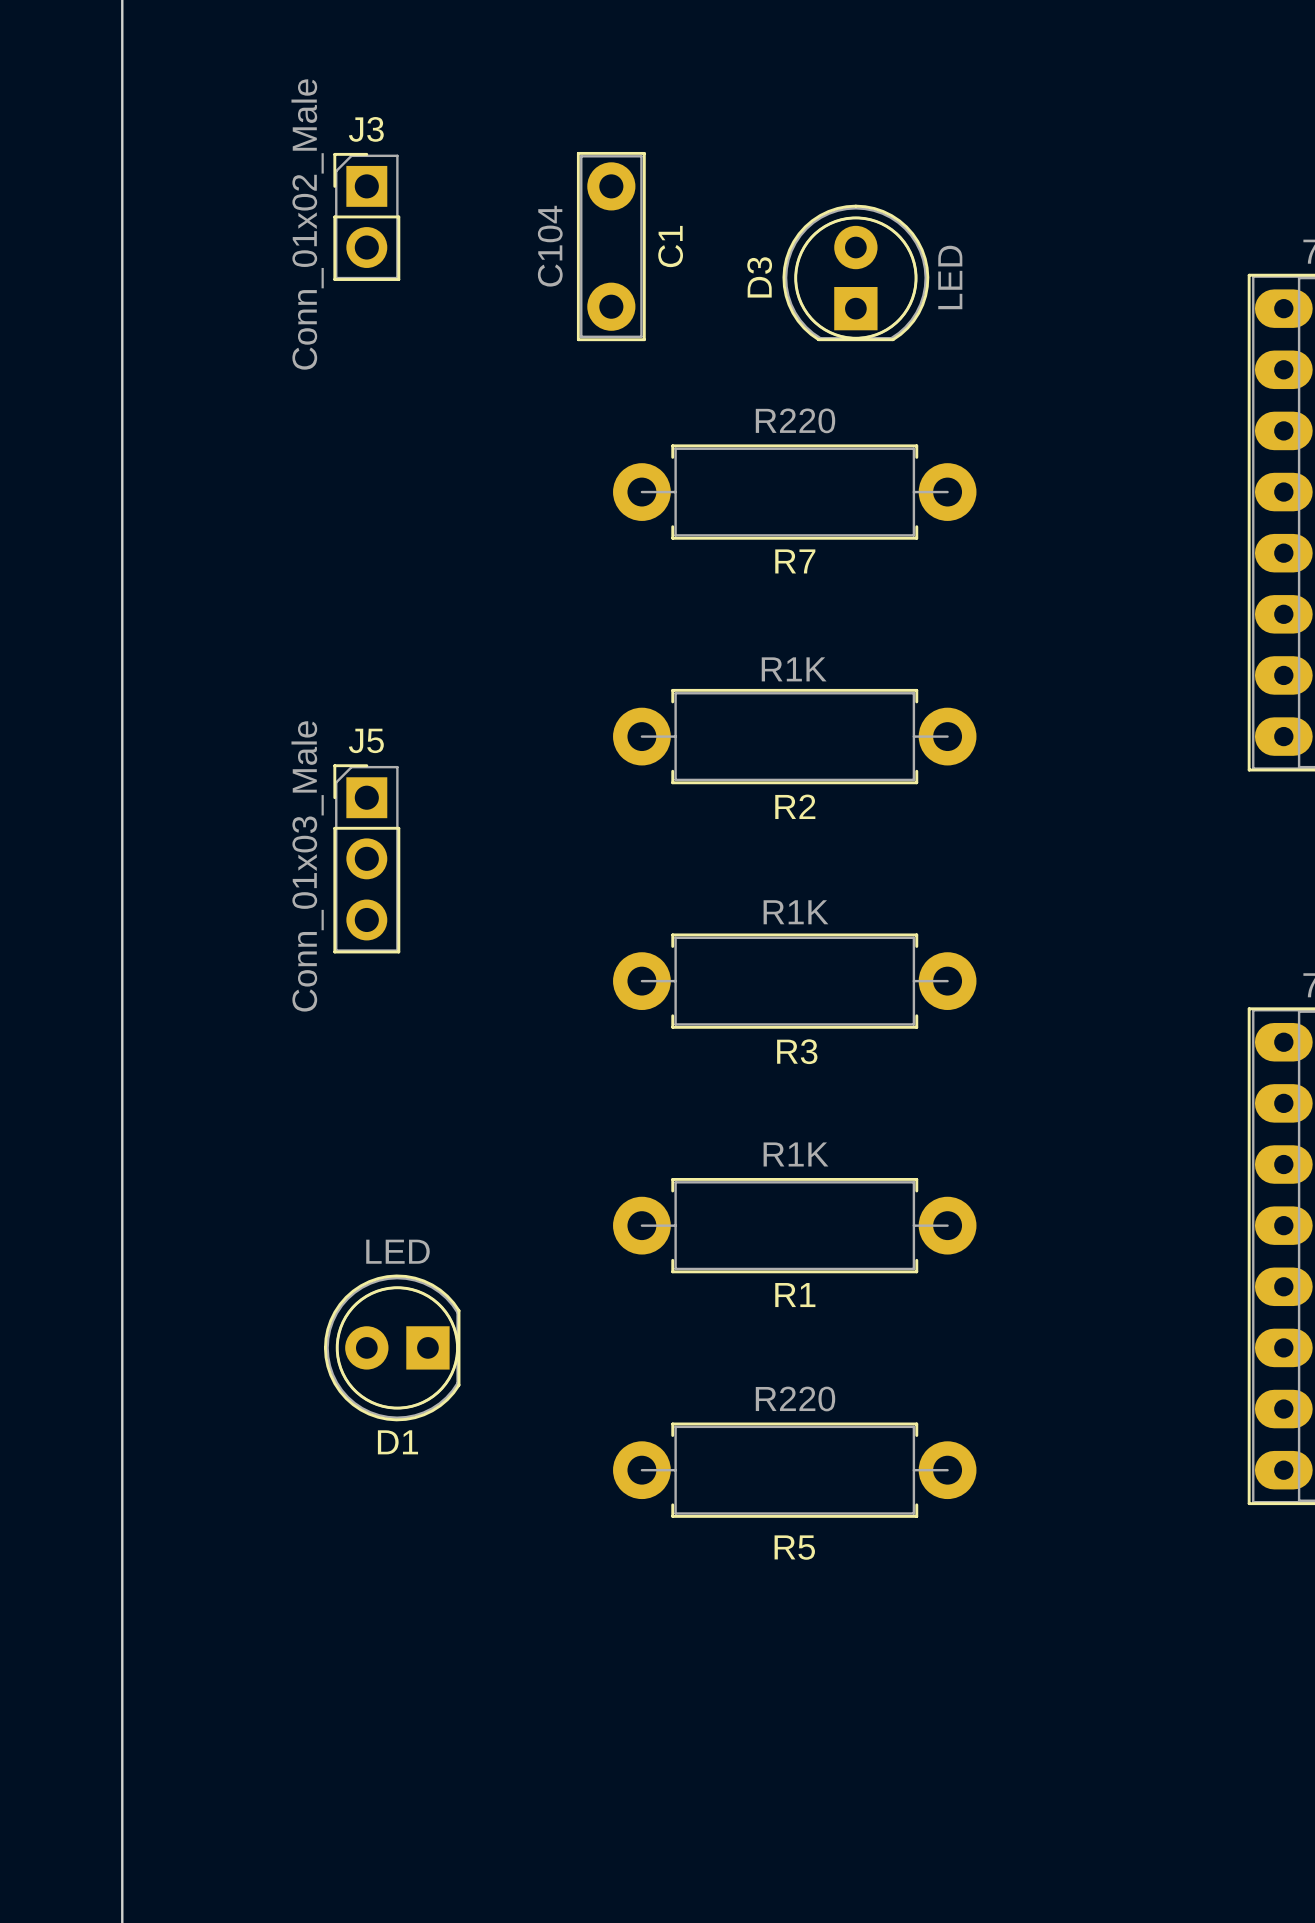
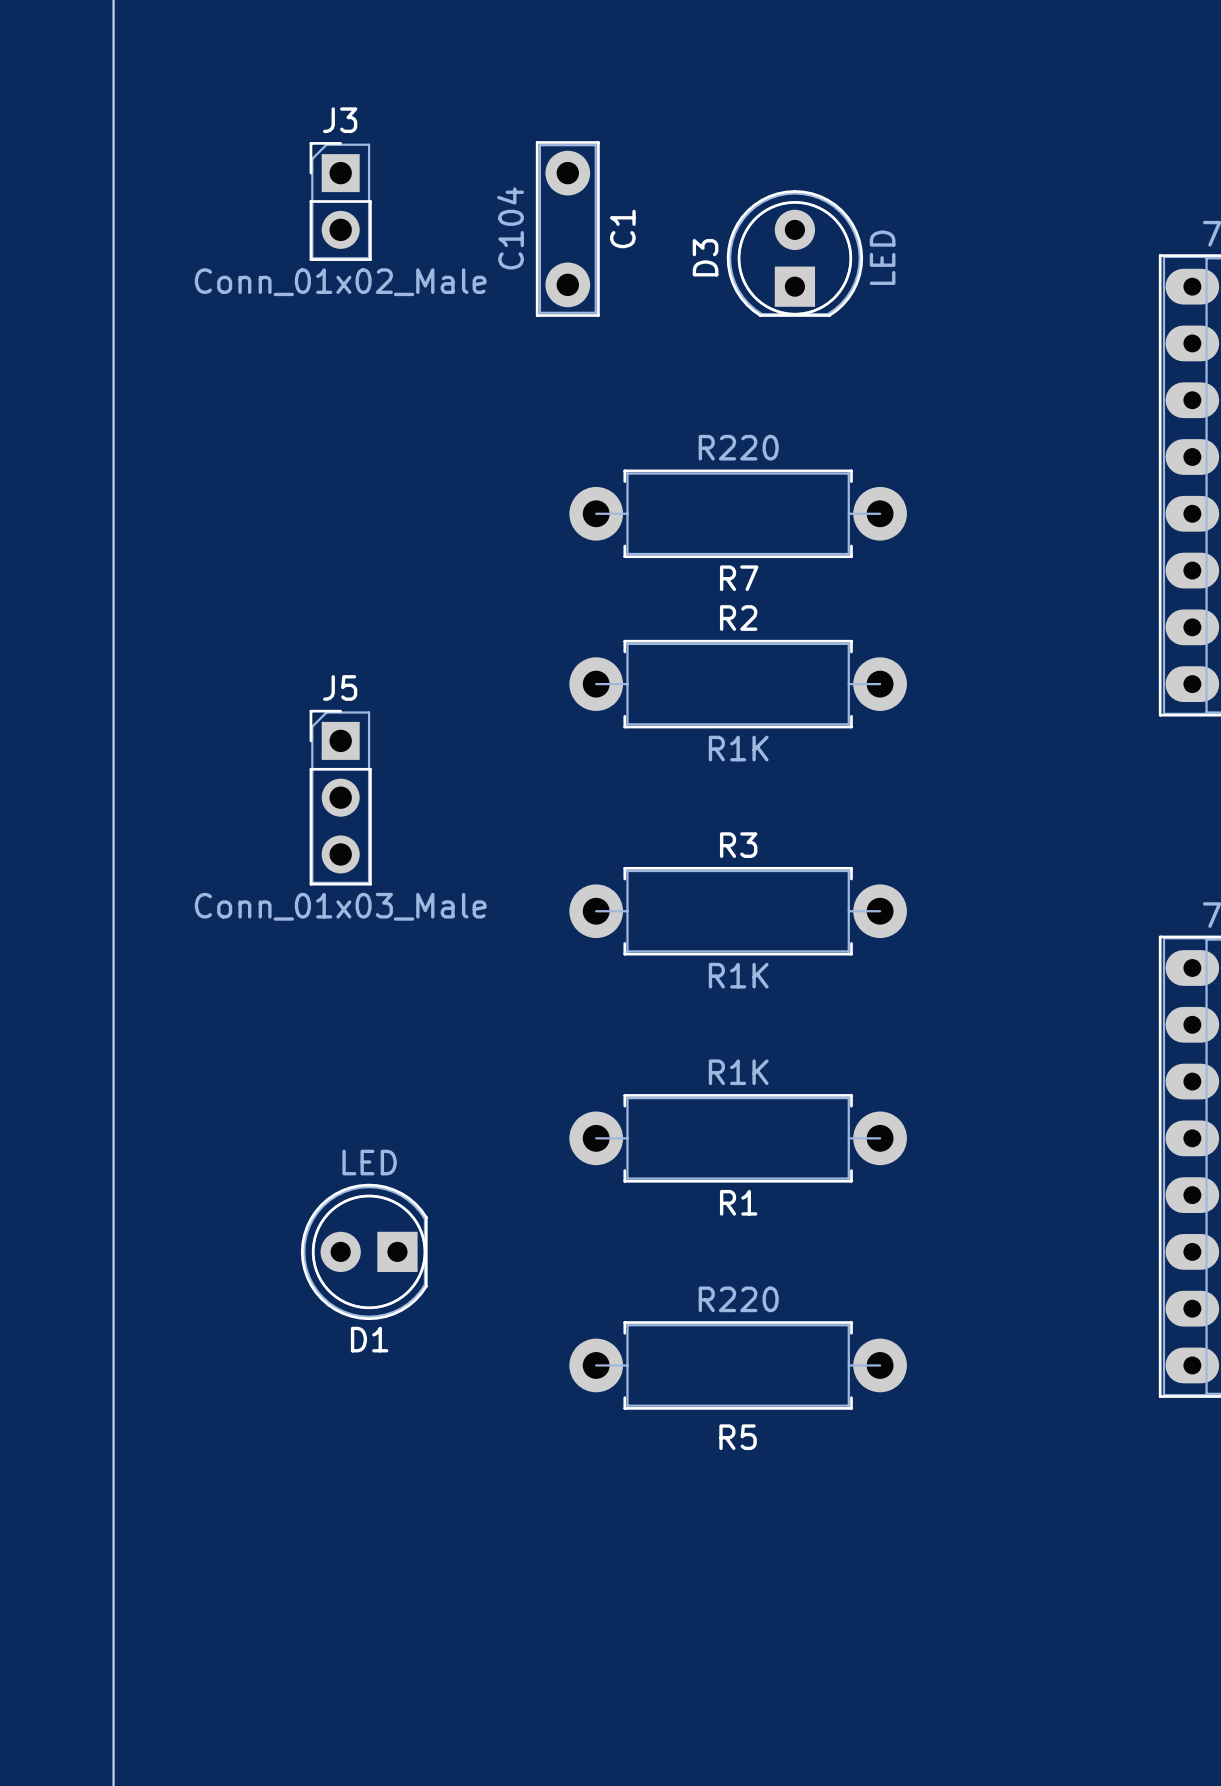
J3 value rotation: 0° (307, 224) -> 90° clockwise (340, 282)
R7 position: (794, 492) -> (738, 513)
R2 value position: R1K (794, 669) -> R1K (738, 748)
R2 name position: R2 (795, 806) -> R2 (738, 618)
J5 value rotation: 0° (307, 866) -> 90° clockwise (340, 906)
R3 value position: R1K (795, 912) -> R1K (738, 975)
R3 name position: R3 (797, 1051) -> R3 (738, 845)

